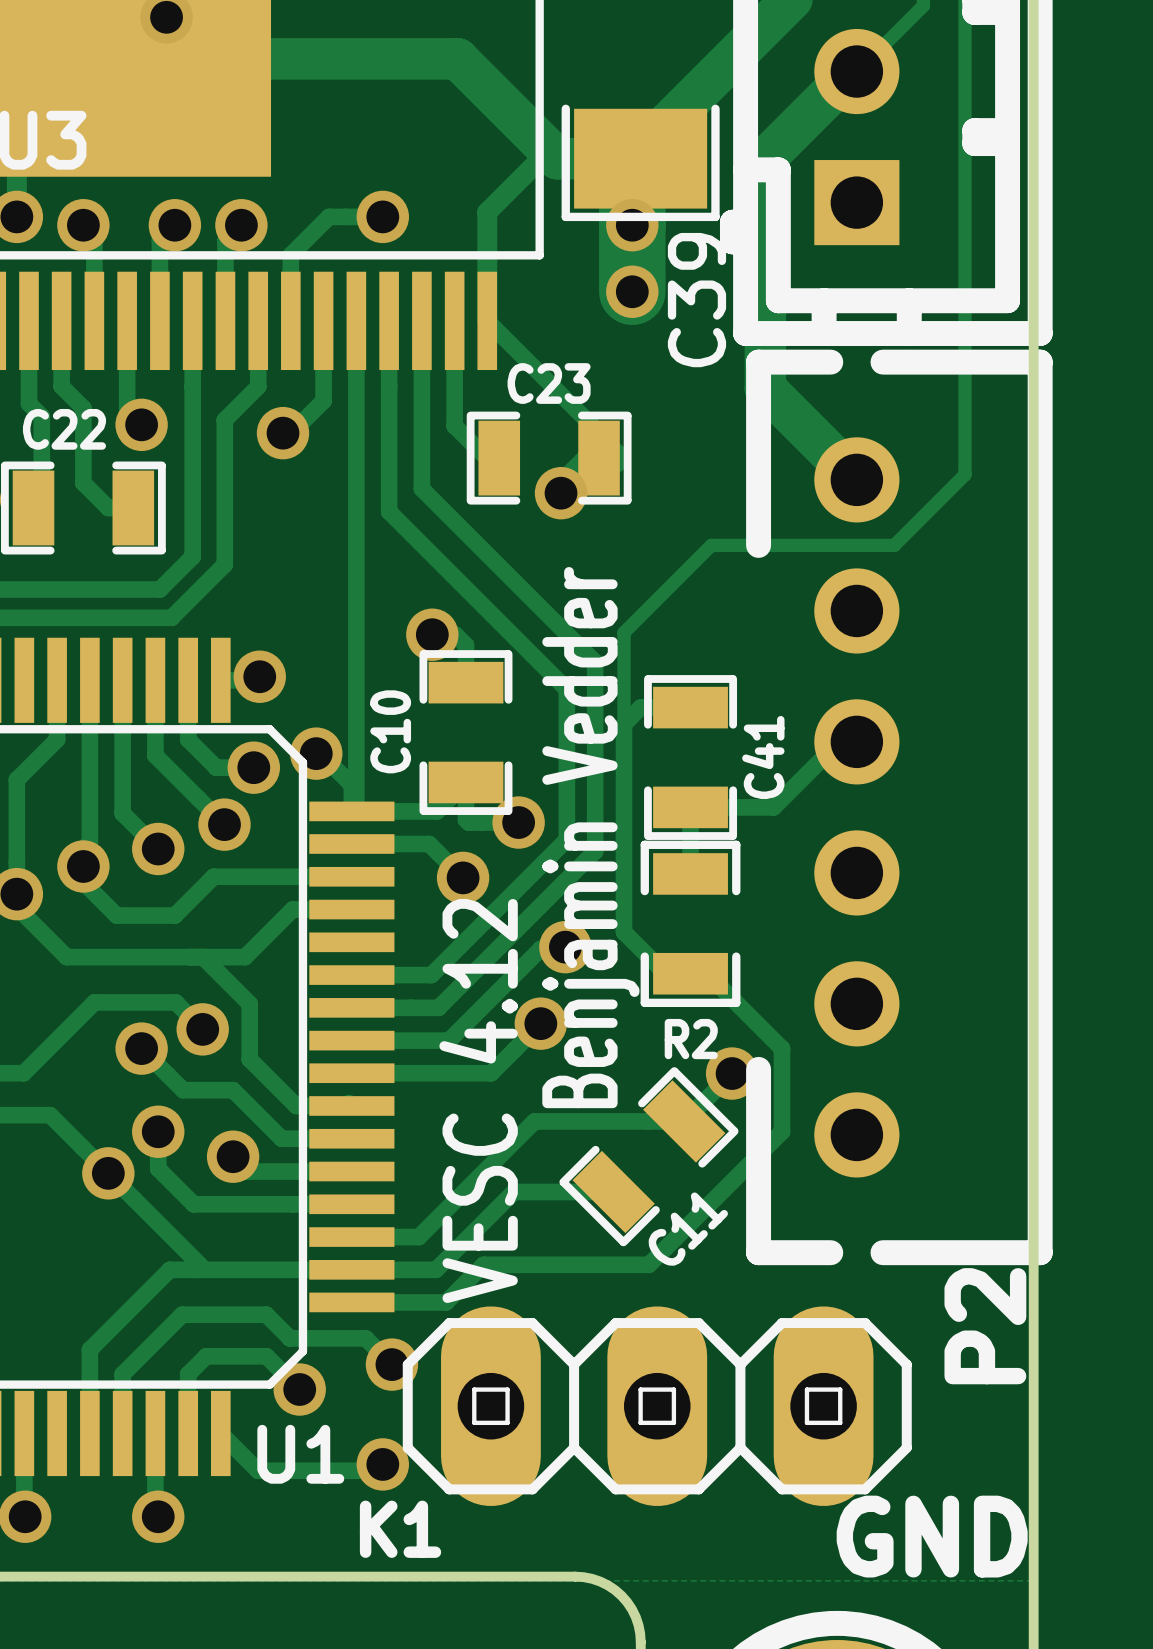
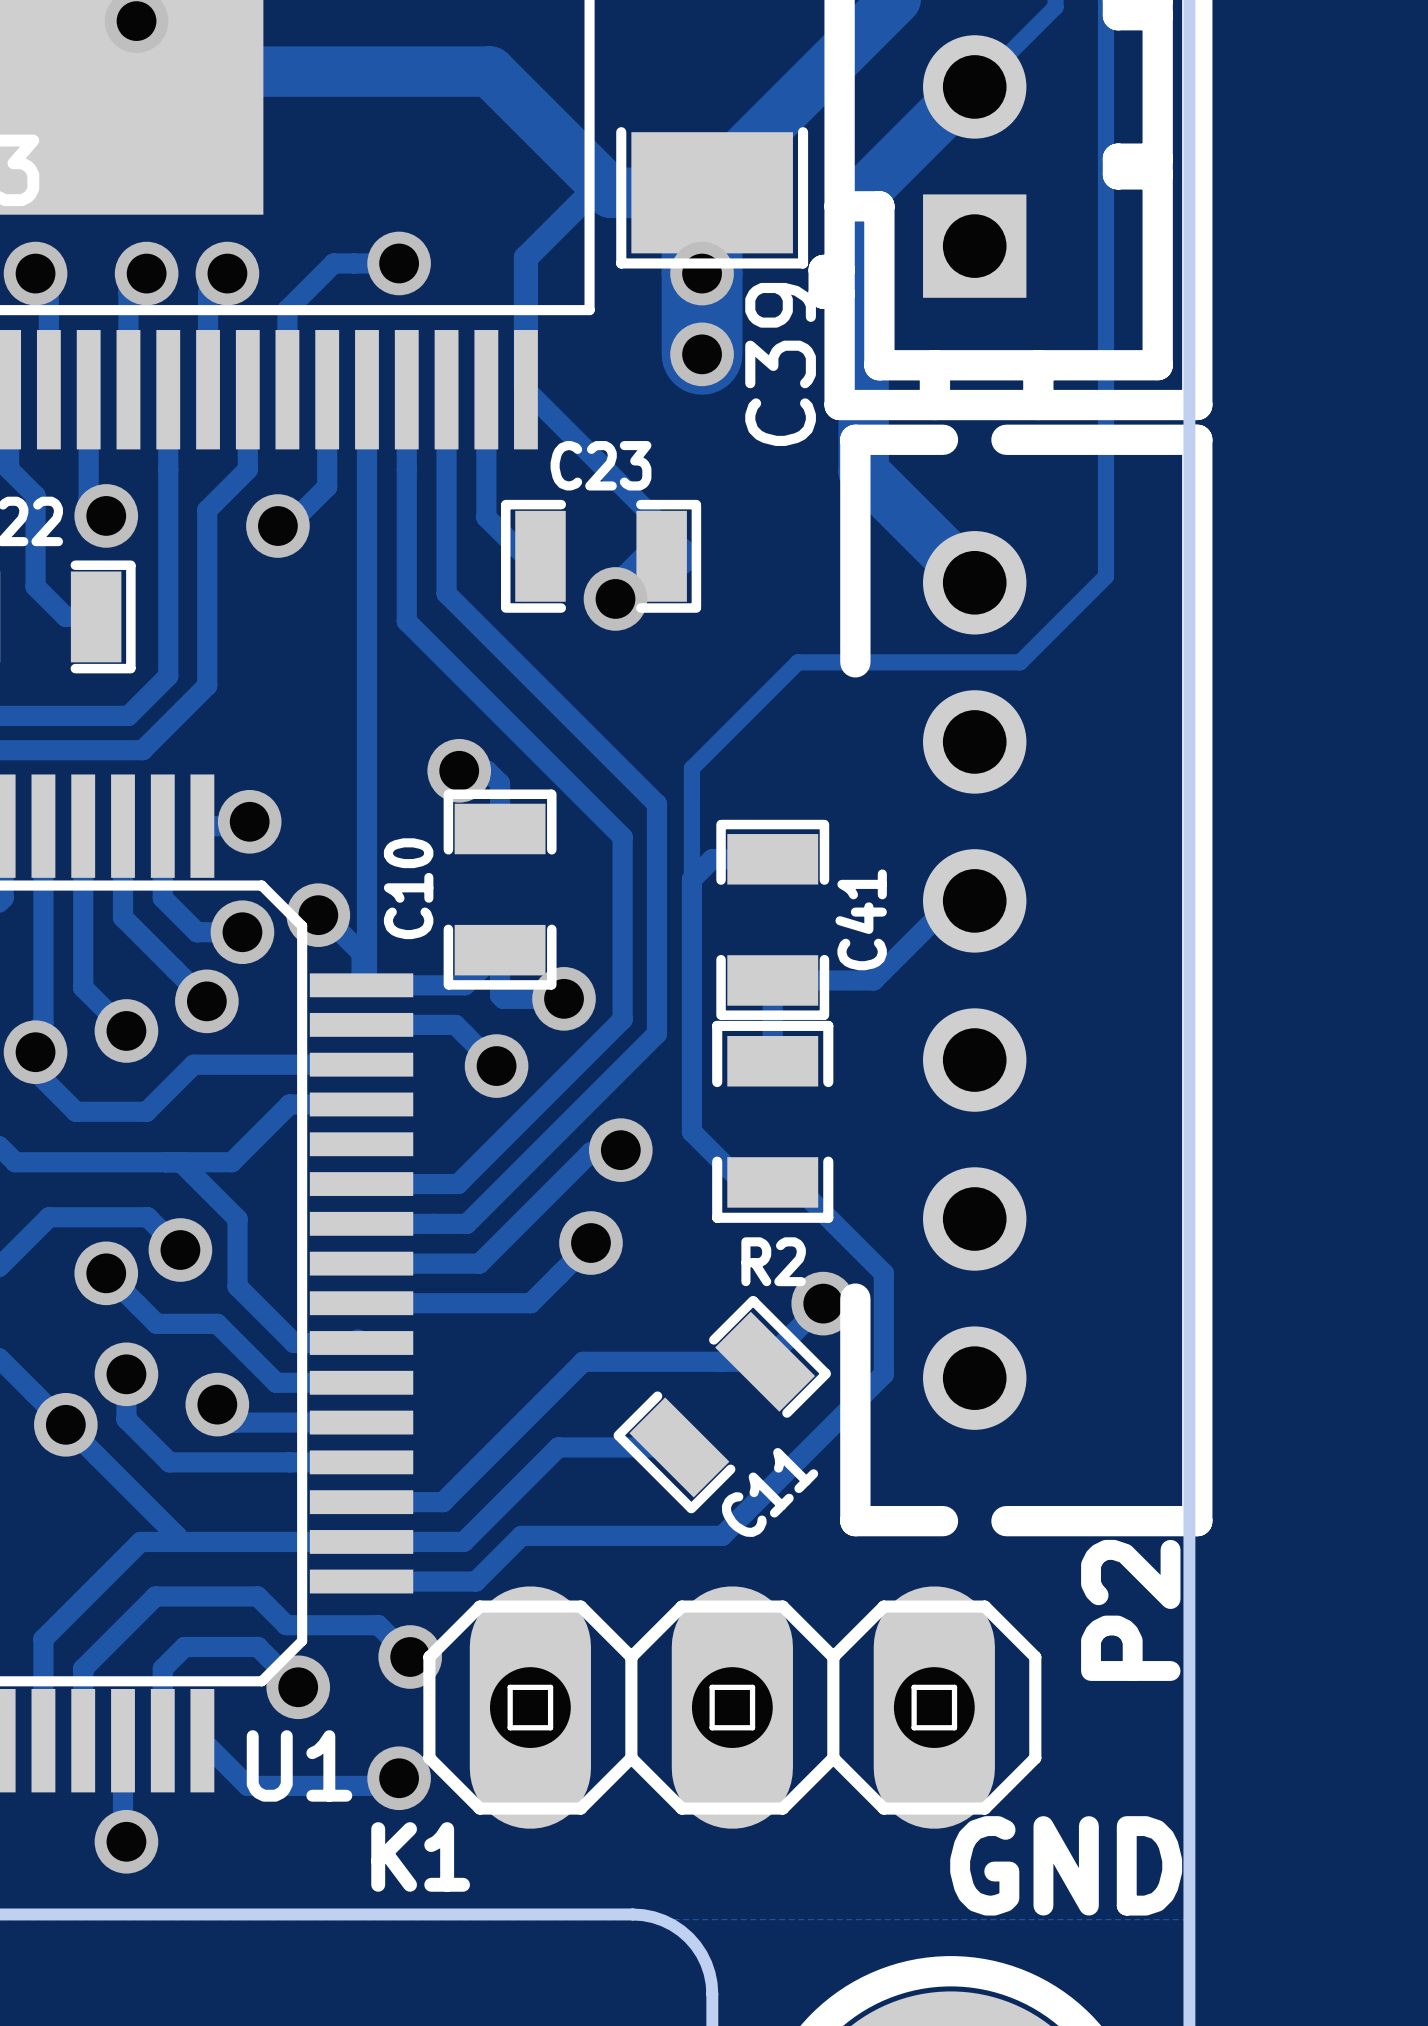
text: Benjamin Vedder (590, 837) -> none
text: VESC 4.12 (478, 1100) -> none

